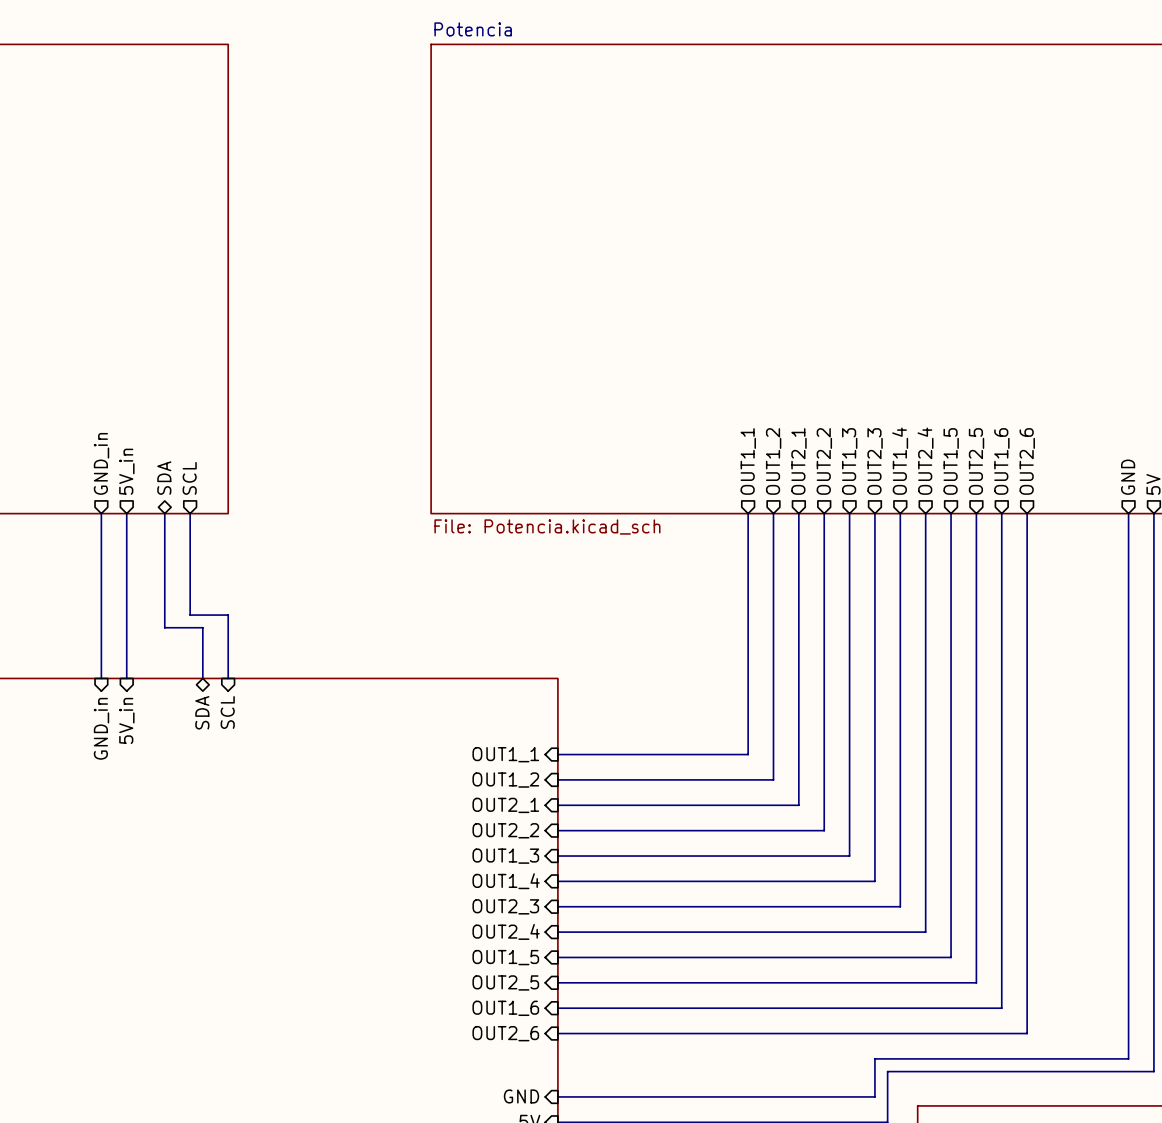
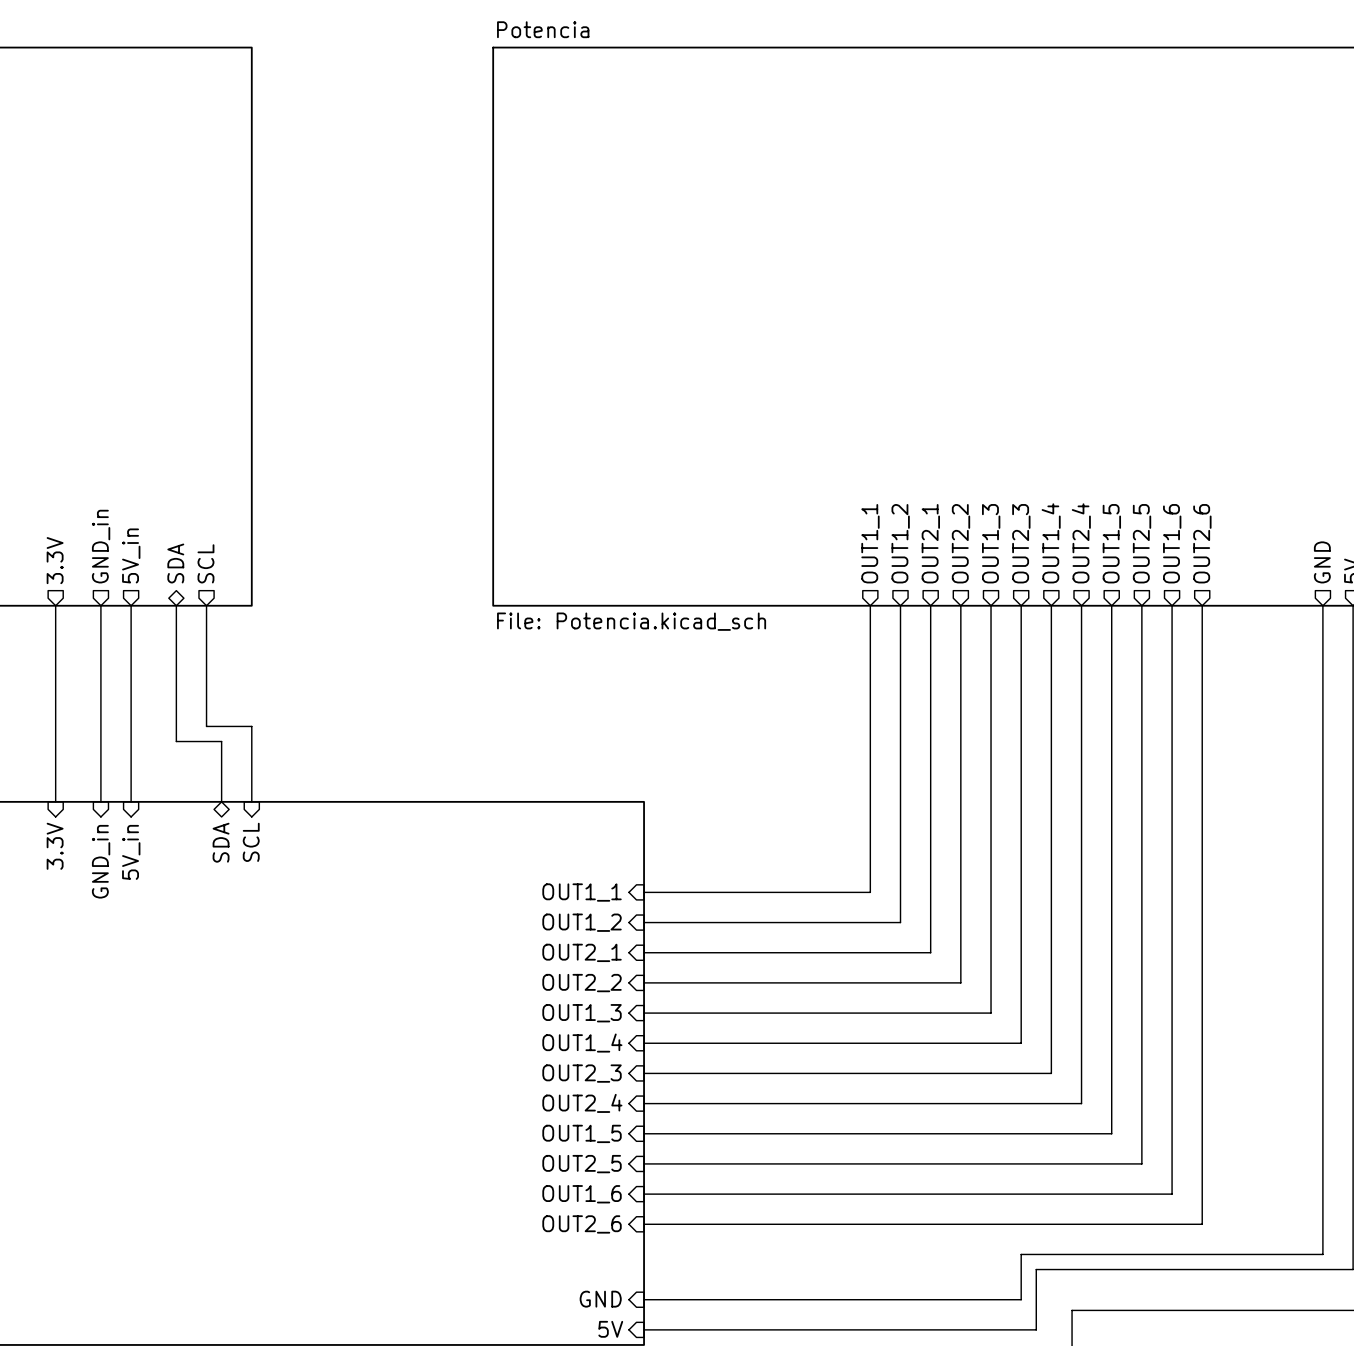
sheet pin: none -> 3.3V (55, 560)
wire: none -> (55, 605) (55, 801)
sheet pin: none -> 3.3V (55, 846)

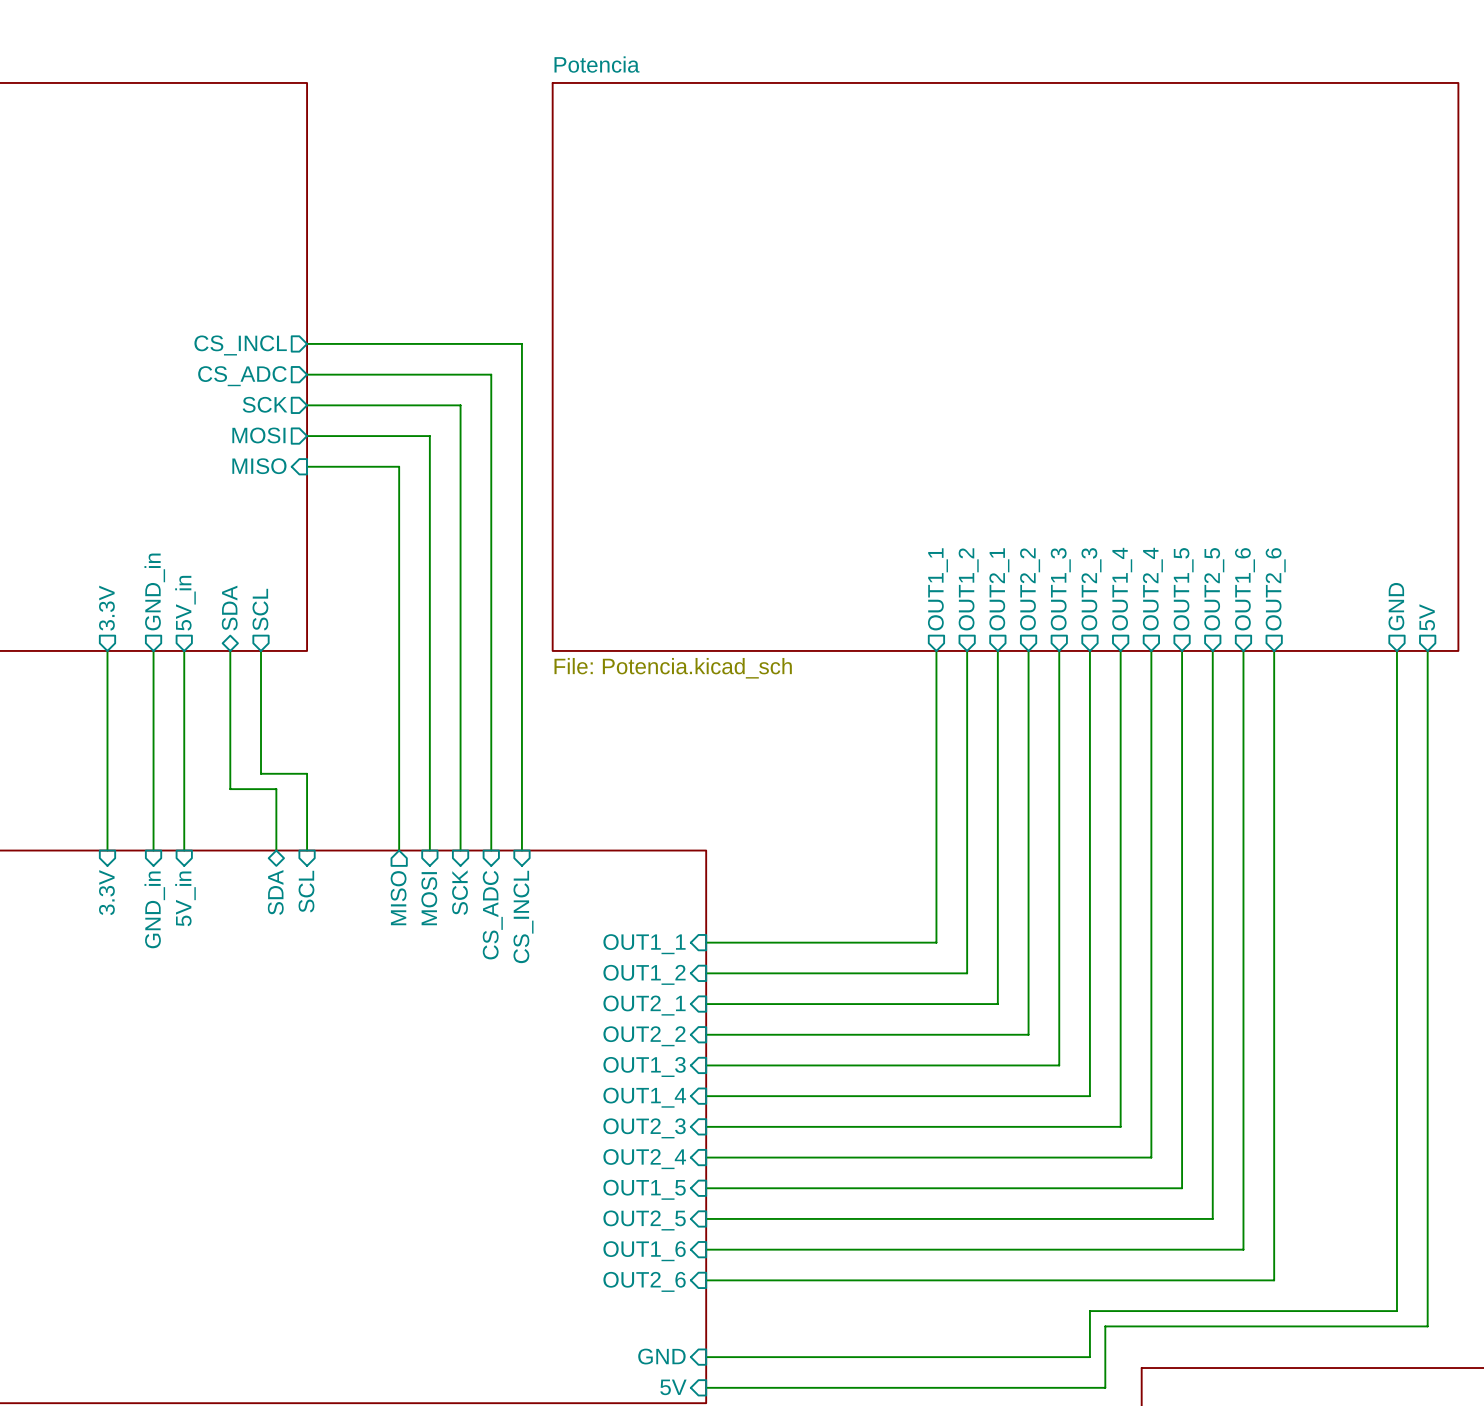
sheet pin: none -> CS_INCL (240, 345)
wire: none -> (307, 343) (521, 343) (521, 850)
sheet pin: none -> CS_ADC (242, 376)
wire: none -> (307, 374) (491, 374) (491, 850)
sheet pin: none -> SCK (265, 404)
wire: none -> (307, 405) (460, 405) (460, 850)
sheet pin: none -> MOSI (258, 435)
wire: none -> (307, 436) (429, 436) (429, 850)
sheet pin: none -> MISO (259, 466)
wire: none -> (307, 466) (399, 466) (399, 850)
sheet pin: none -> SCK (459, 892)
sheet pin: none -> MISO (398, 898)
sheet pin: none -> MOSI (429, 898)
sheet pin: none -> CS_ADC (492, 915)
sheet pin: none -> CS_INCL (523, 916)

